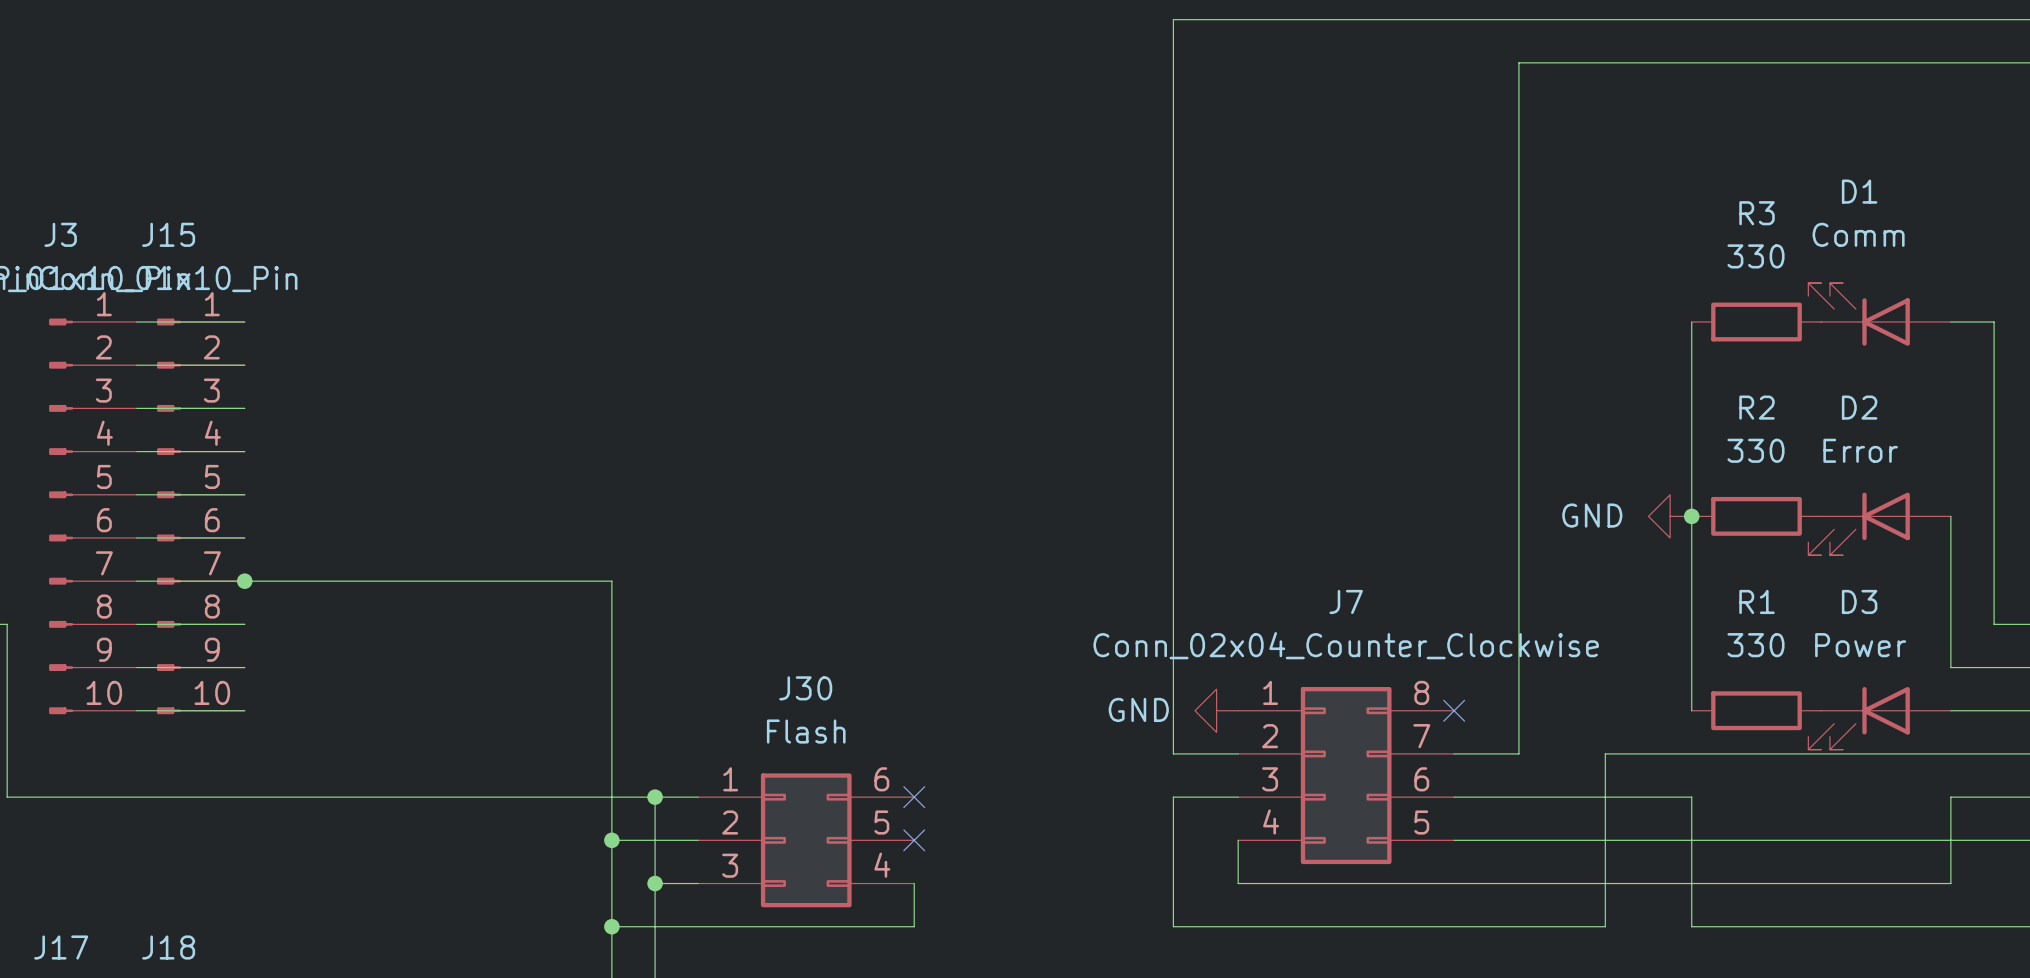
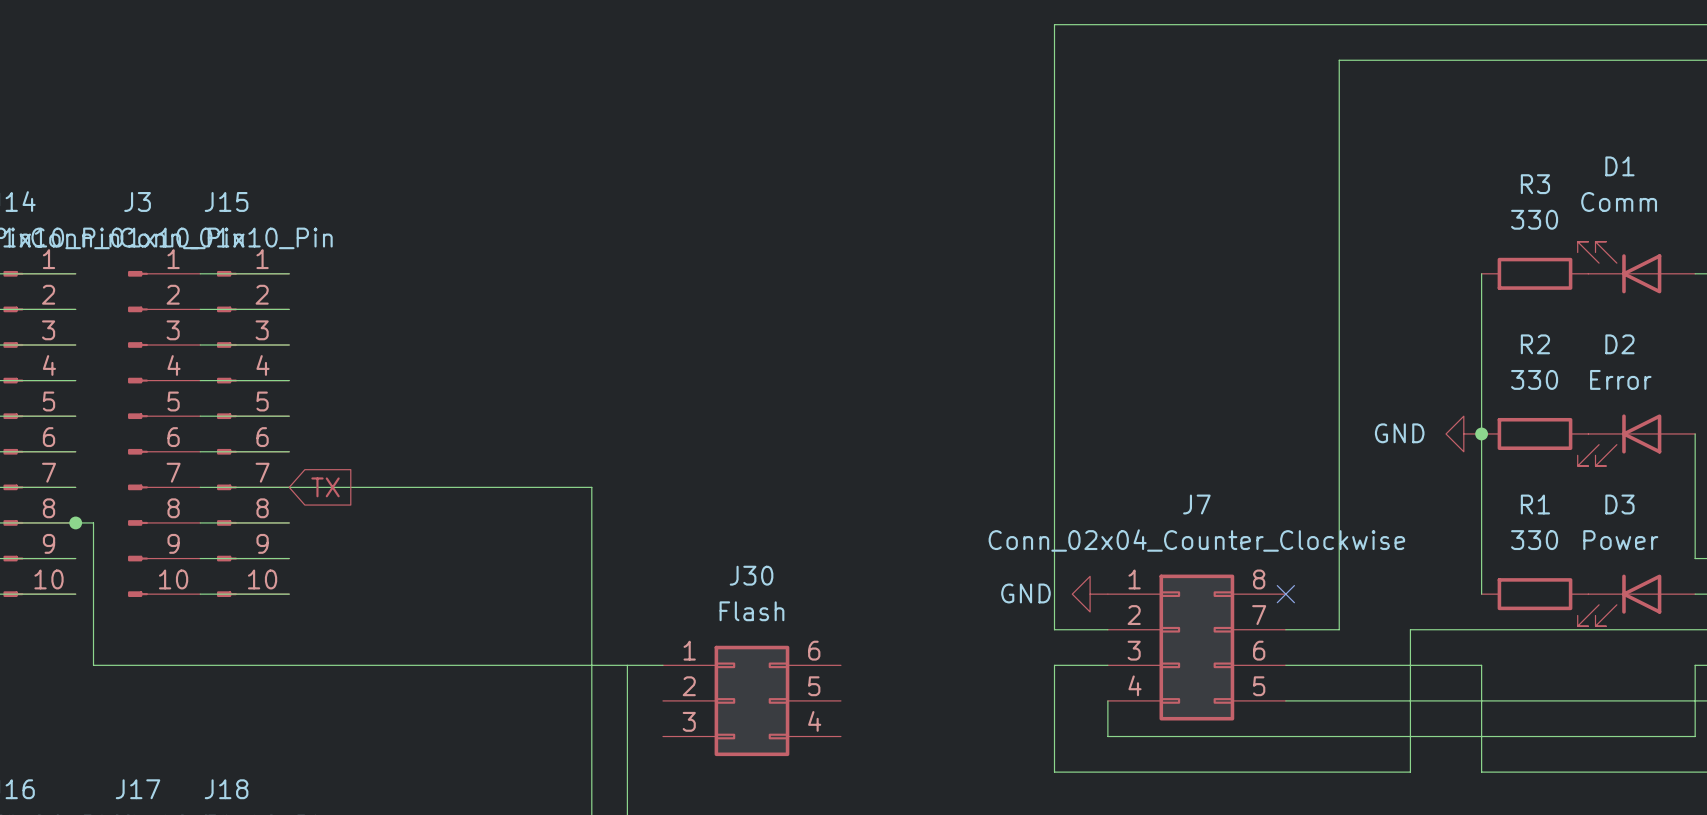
junction: (244, 581) -> none
global label: none -> TX (325, 487)
junction: (655, 797) -> none
no-connect mark: (914, 797) -> none
wire: (611, 840) (698, 840) -> none
junction: (611, 840) -> none
no-connect mark: (914, 840) -> none
wire: (655, 883) (698, 883) -> none
junction: (655, 883) -> none
wire: (914, 883) (914, 926) (611, 926) -> none
junction: (611, 926) -> none

